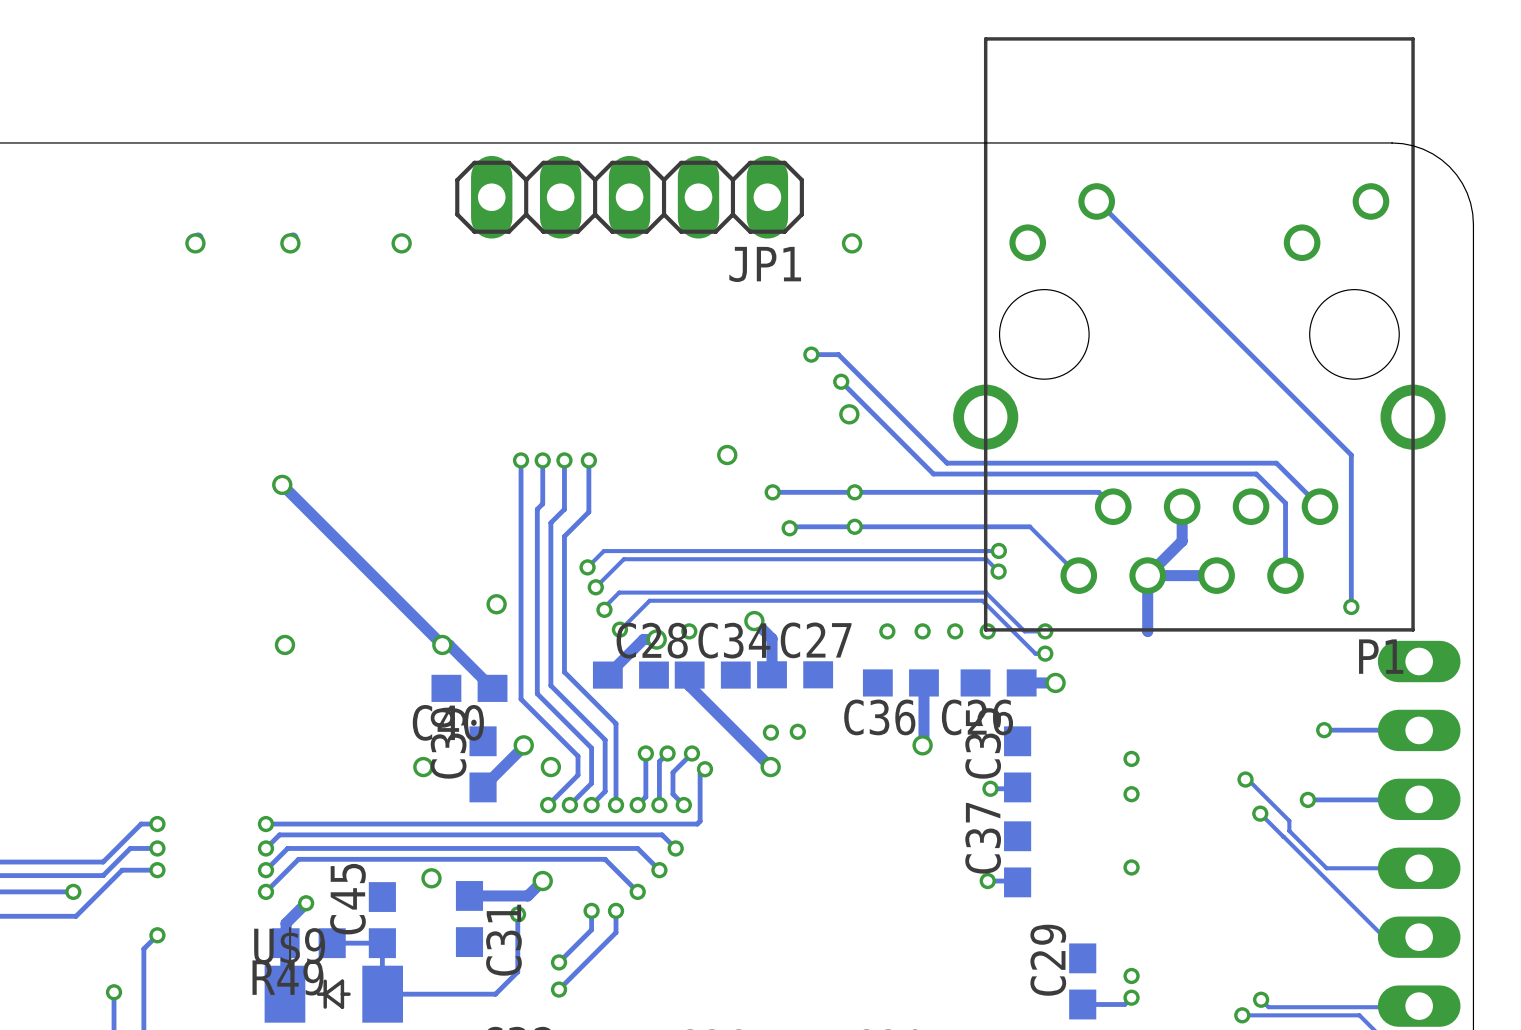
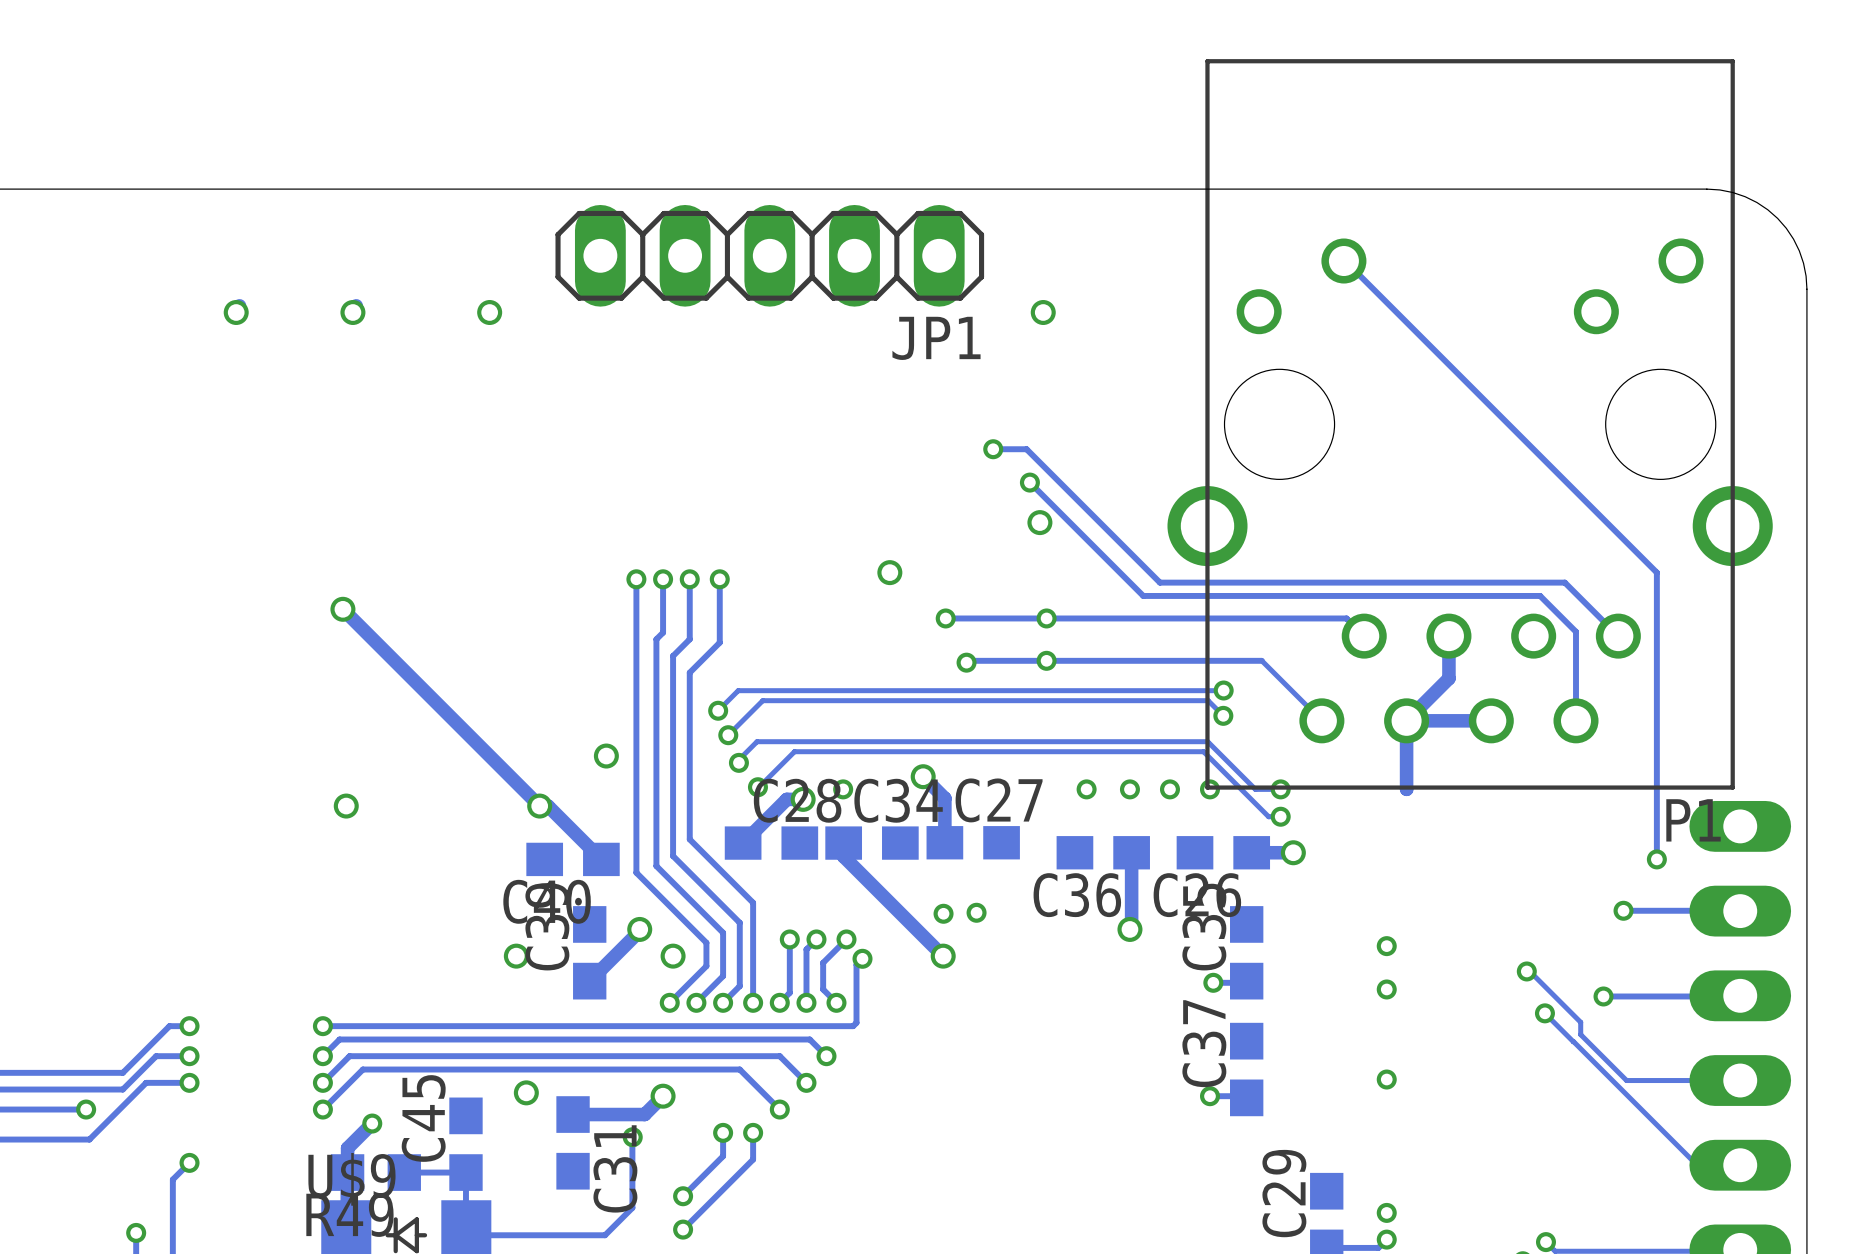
track: none -> (1656, 759) (1656, 859)
via position: (1351, 606) -> (1656, 859)

